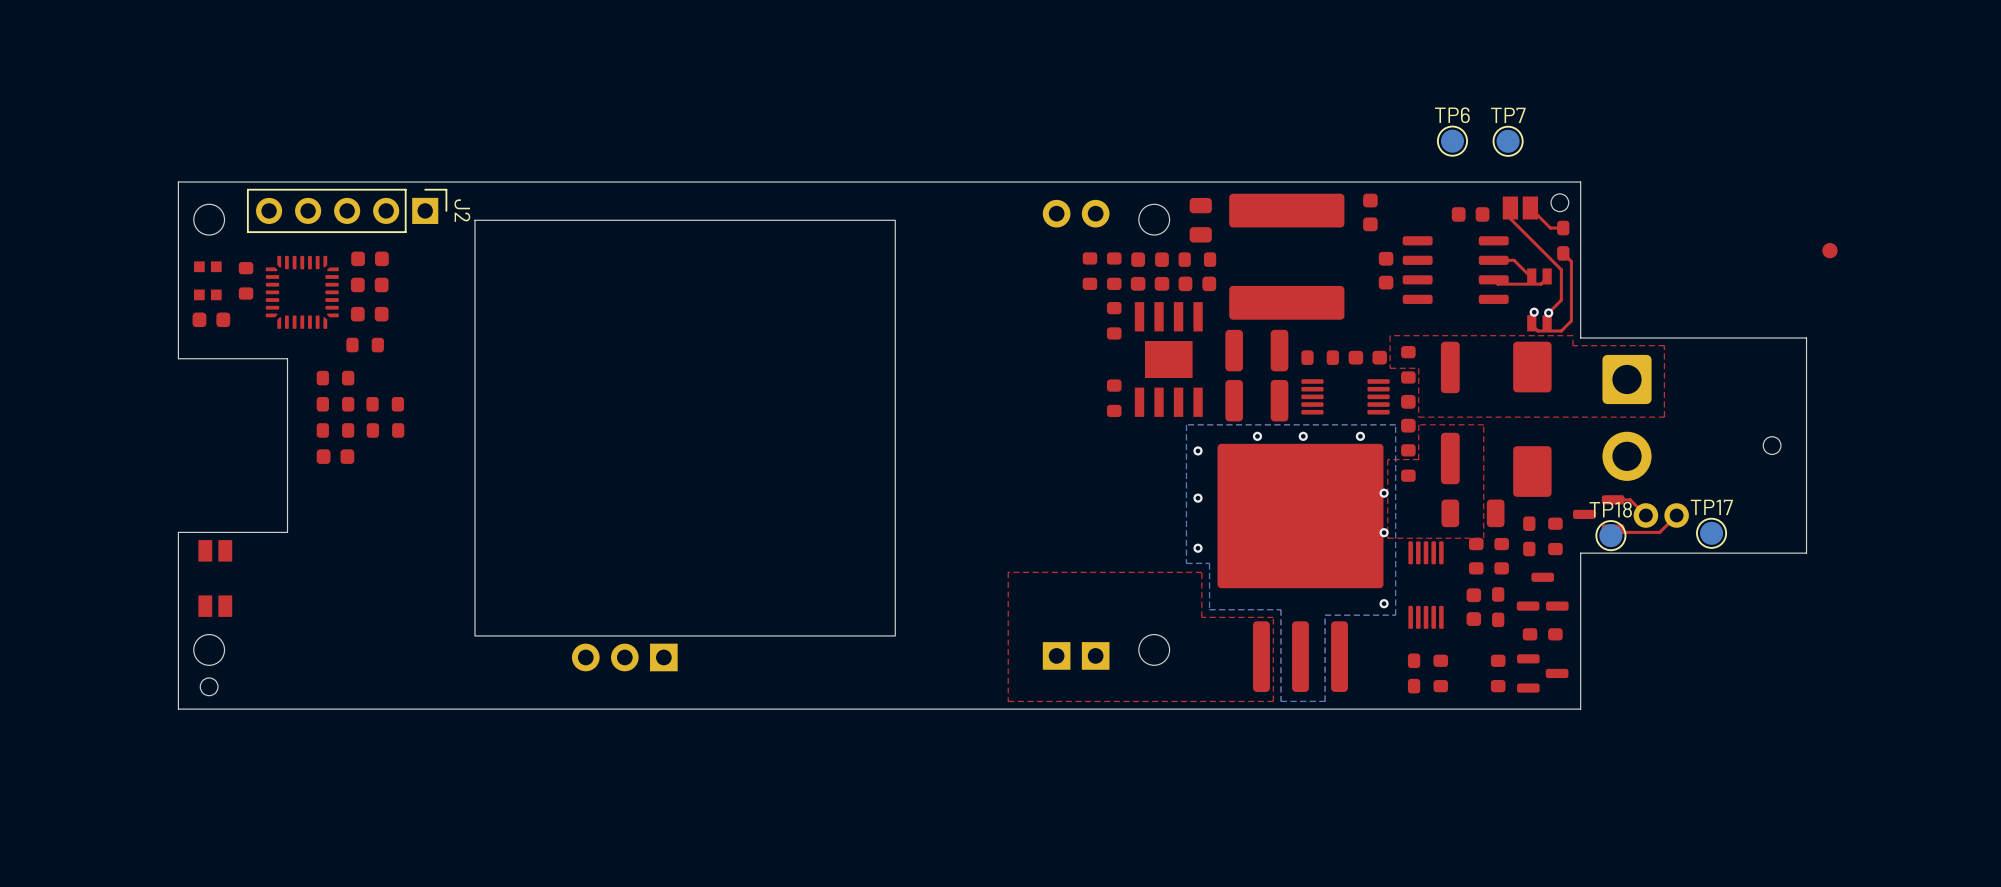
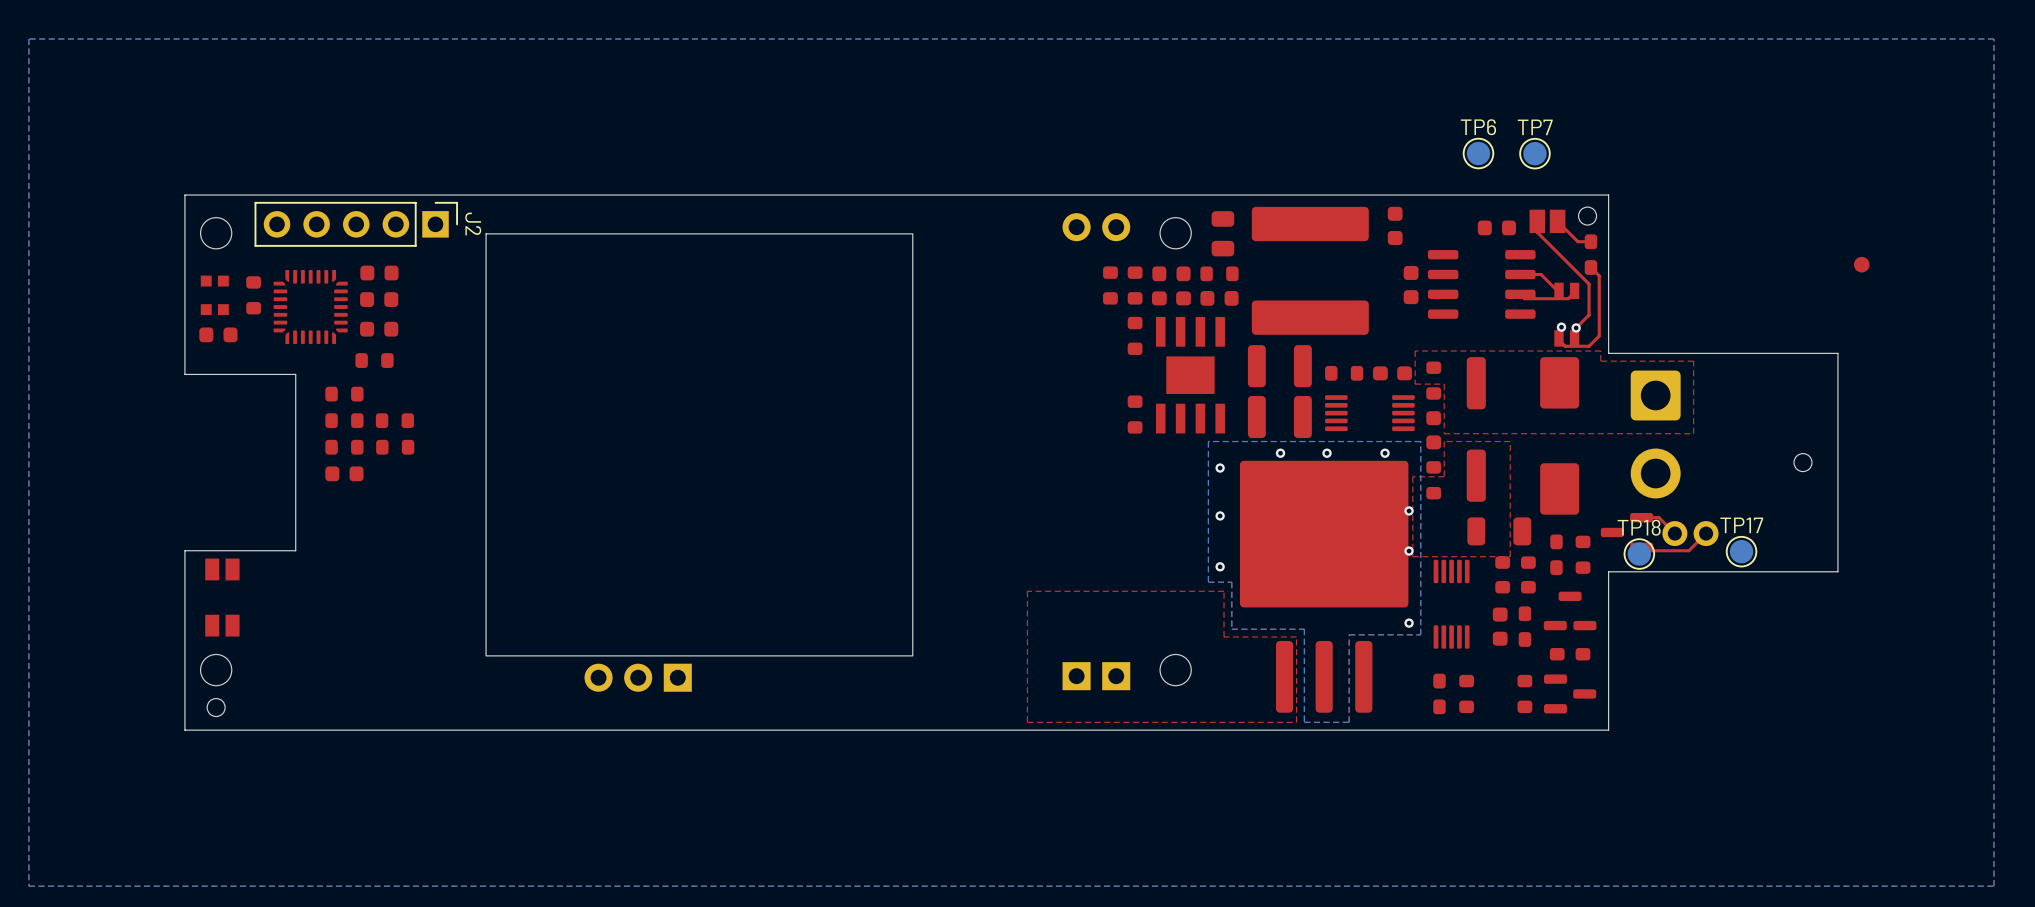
top zone outline: none -> (1993, 38) (28, 38) (28, 886) (1993, 886) (1993, 38)
bottom zone outline: none -> (1993, 38) (28, 38) (28, 886) (1993, 886) (1993, 38)

